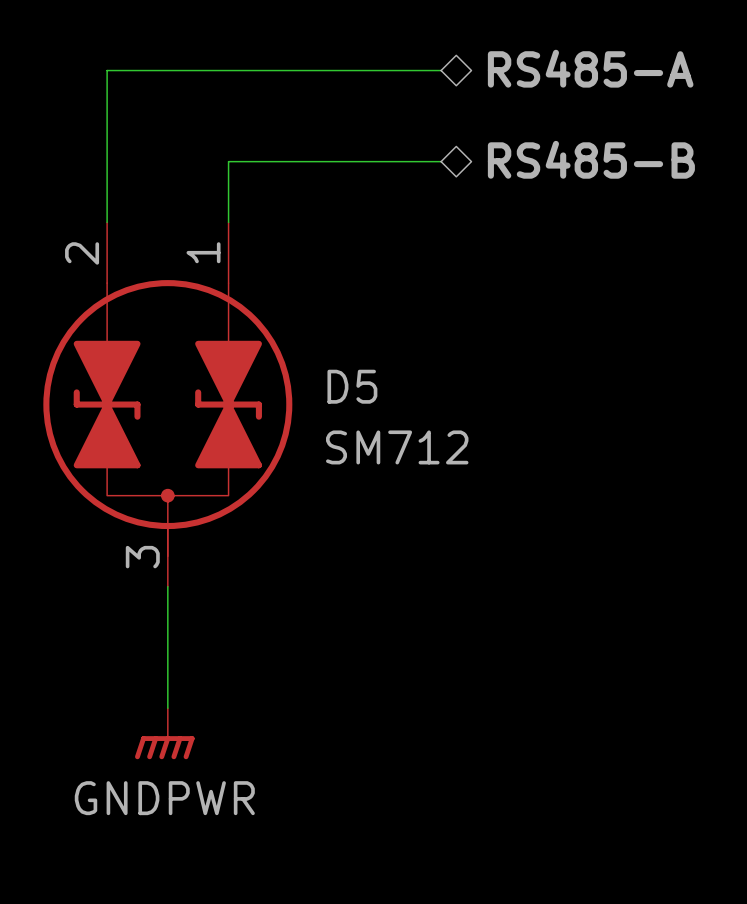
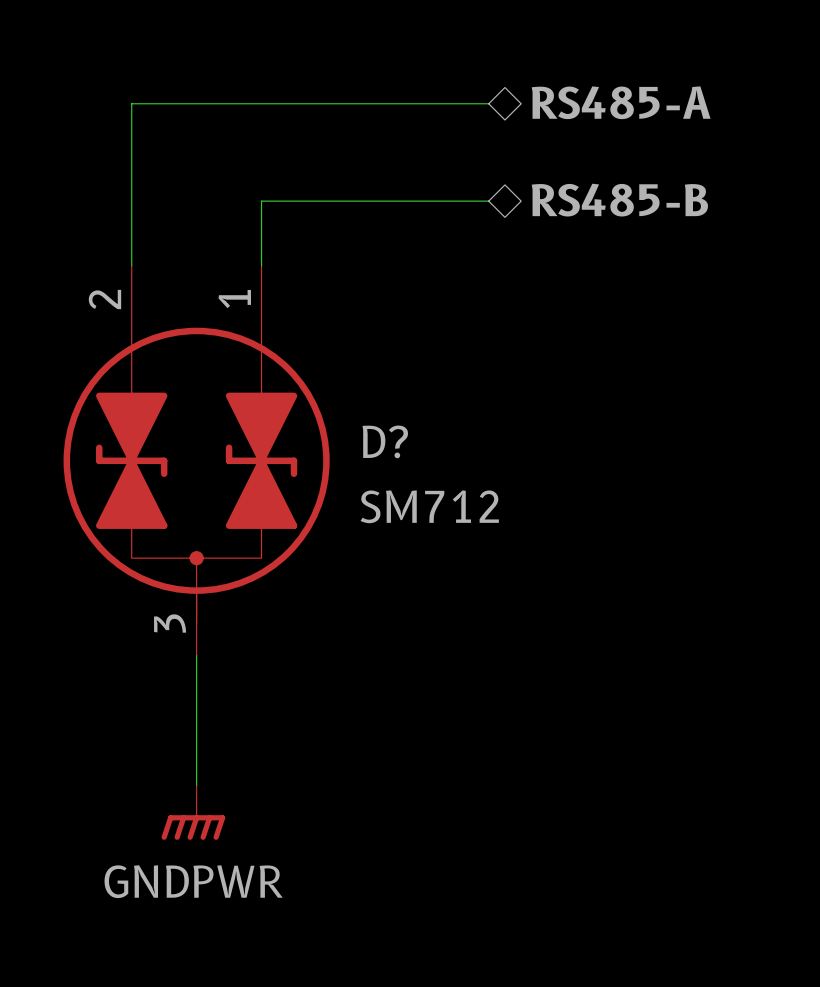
D5 name: D5 (352, 386) -> D? (385, 441)

